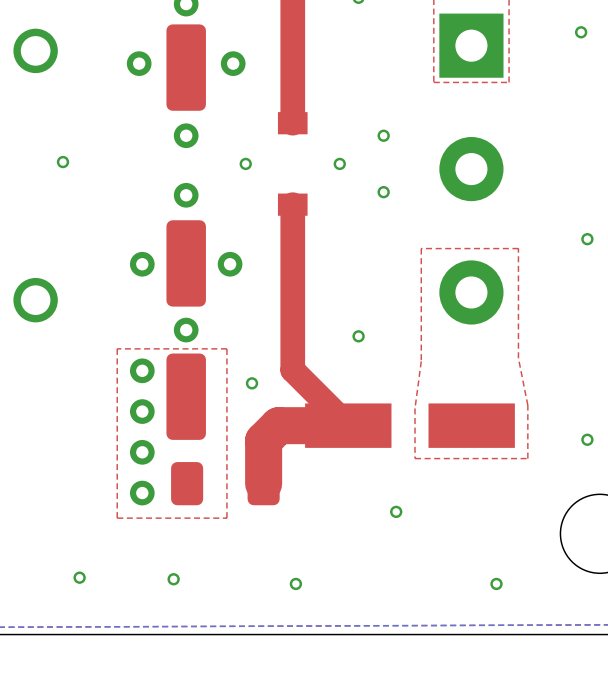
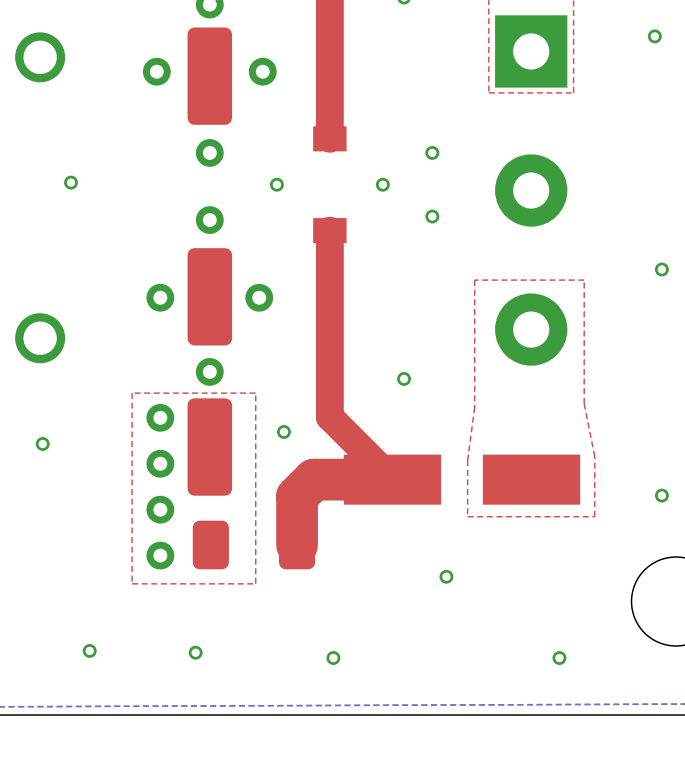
via: none -> (42, 443)

